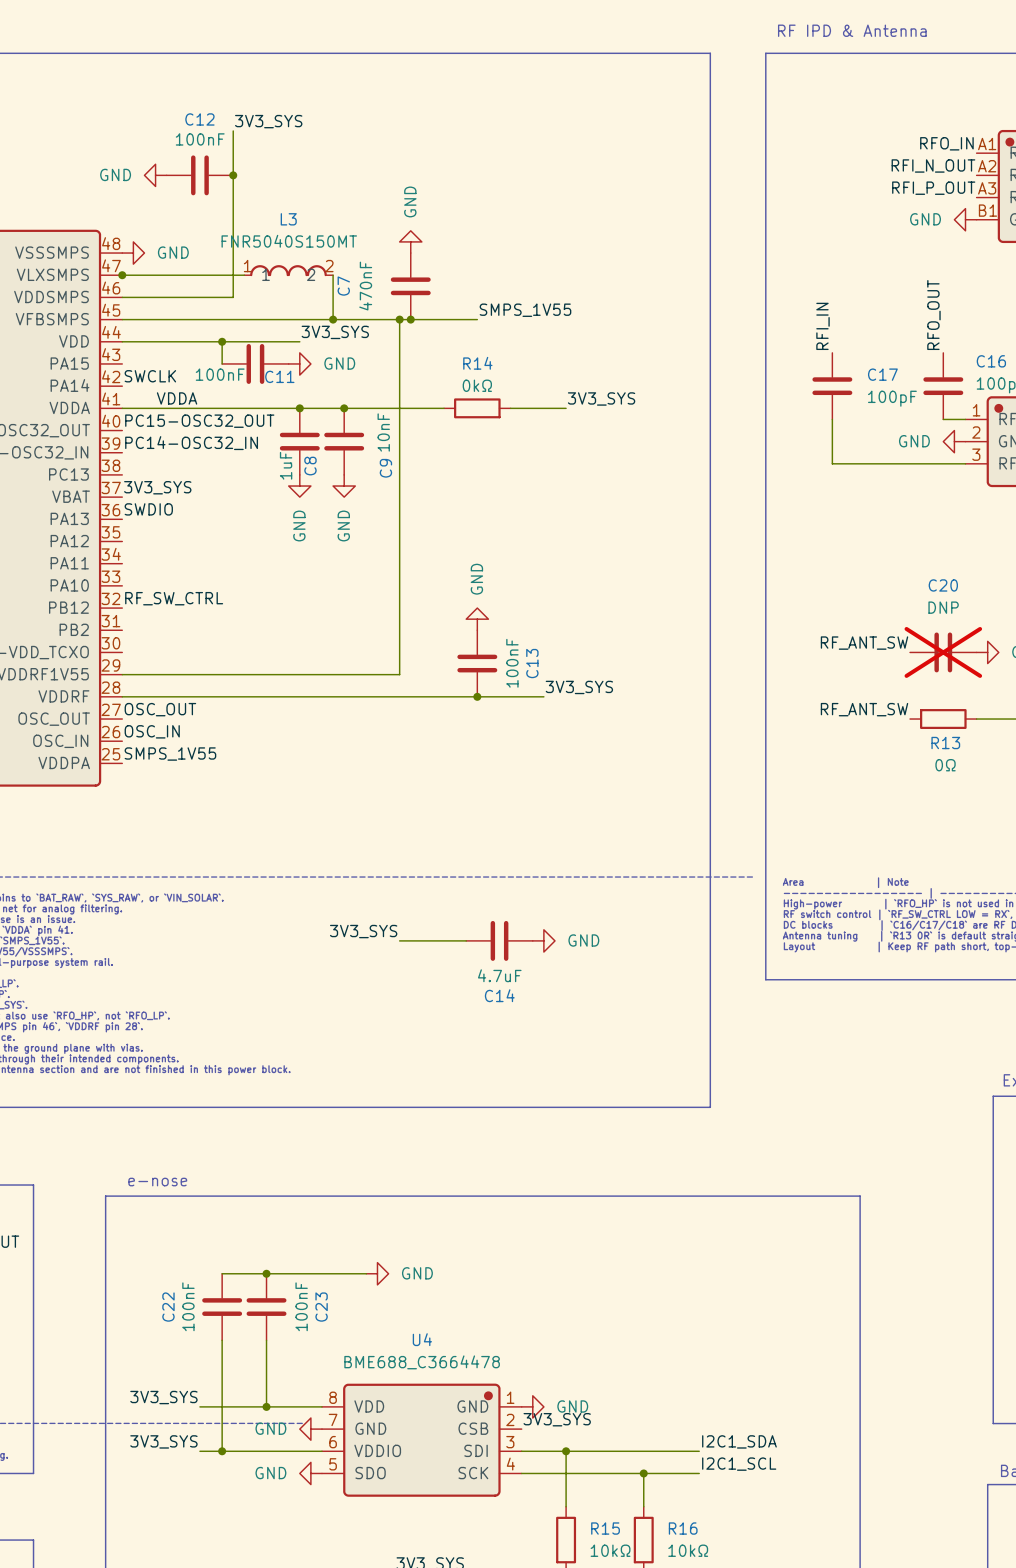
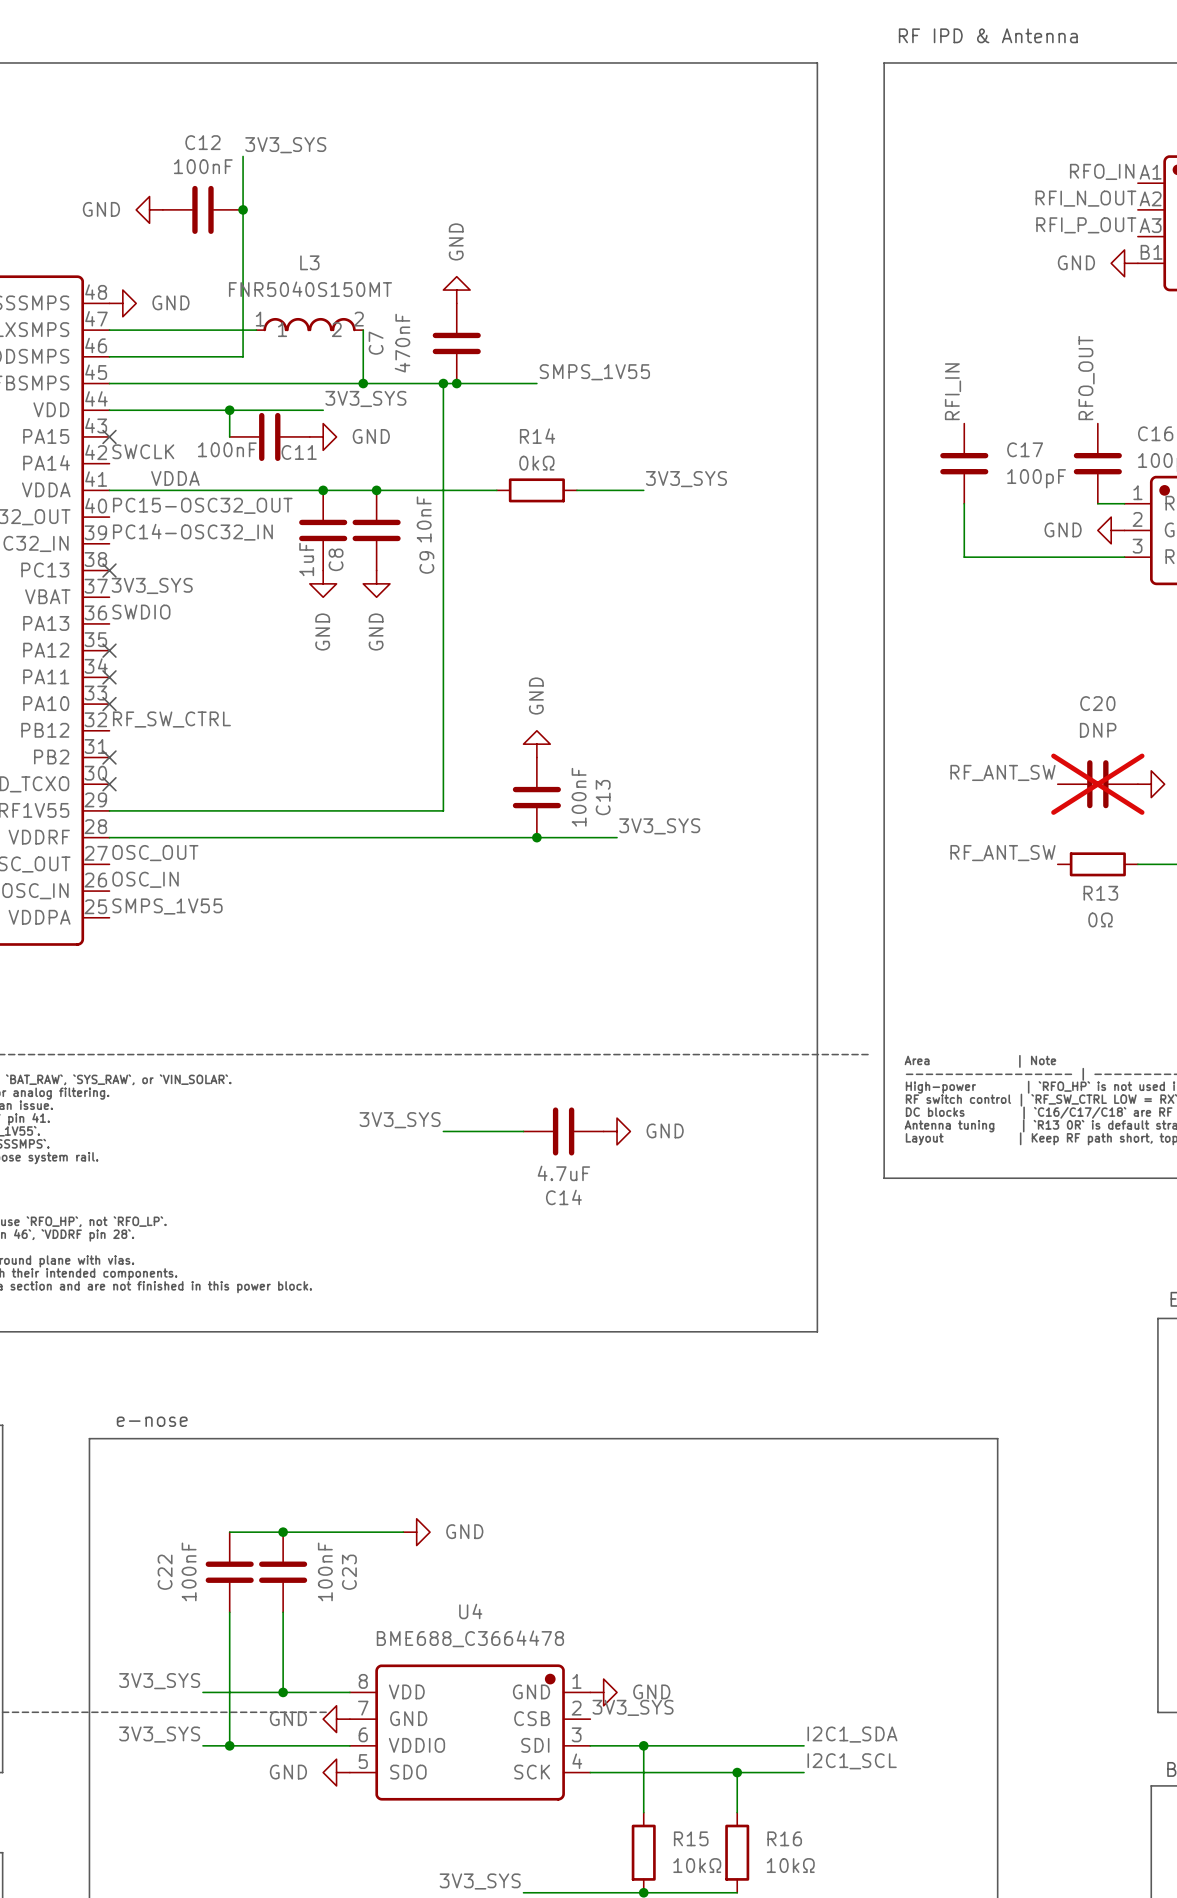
junction: (122, 275) -> none
no-connect mark: none -> (109, 436)
no-connect mark: none -> (109, 570)
no-connect mark: none -> (109, 650)
no-connect mark: none -> (109, 677)
no-connect mark: none -> (109, 704)
no-connect mark: none -> (109, 757)
no-connect mark: none -> (109, 784)

